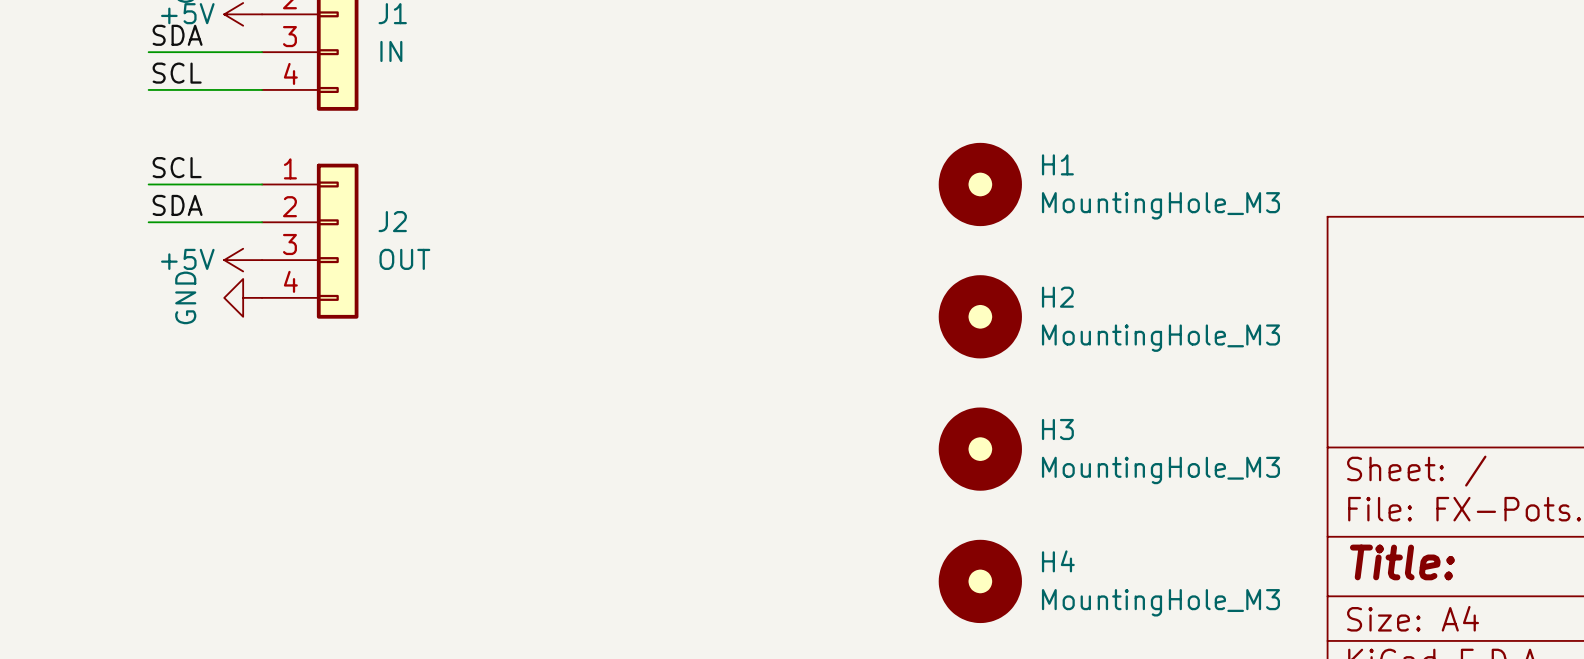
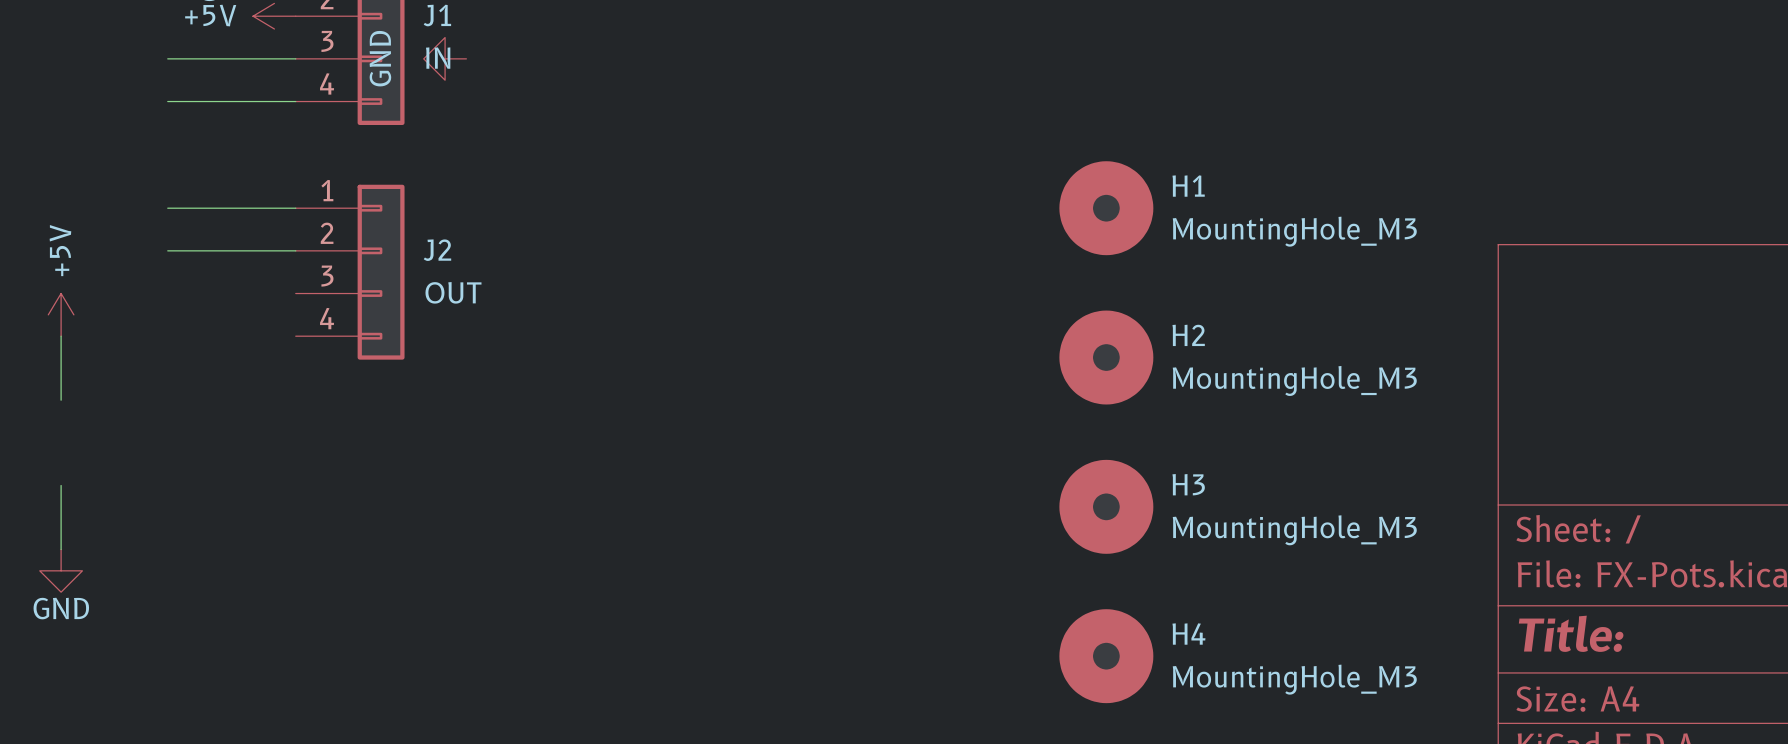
label: SDA (177, 35) -> none
power symbol: none -> GND (445, 58)
label: SCL (177, 73) -> none
label: SCL (177, 167) -> none
label: SDA (177, 205) -> none
power symbol: +5V (243, 260) -> none
power symbol: none -> +5V (61, 314)
wire: none -> (61, 336) (61, 400)
power symbol: GND (243, 297) -> none
wire: none -> (61, 485) (61, 549)
power symbol: none -> GND (61, 570)

